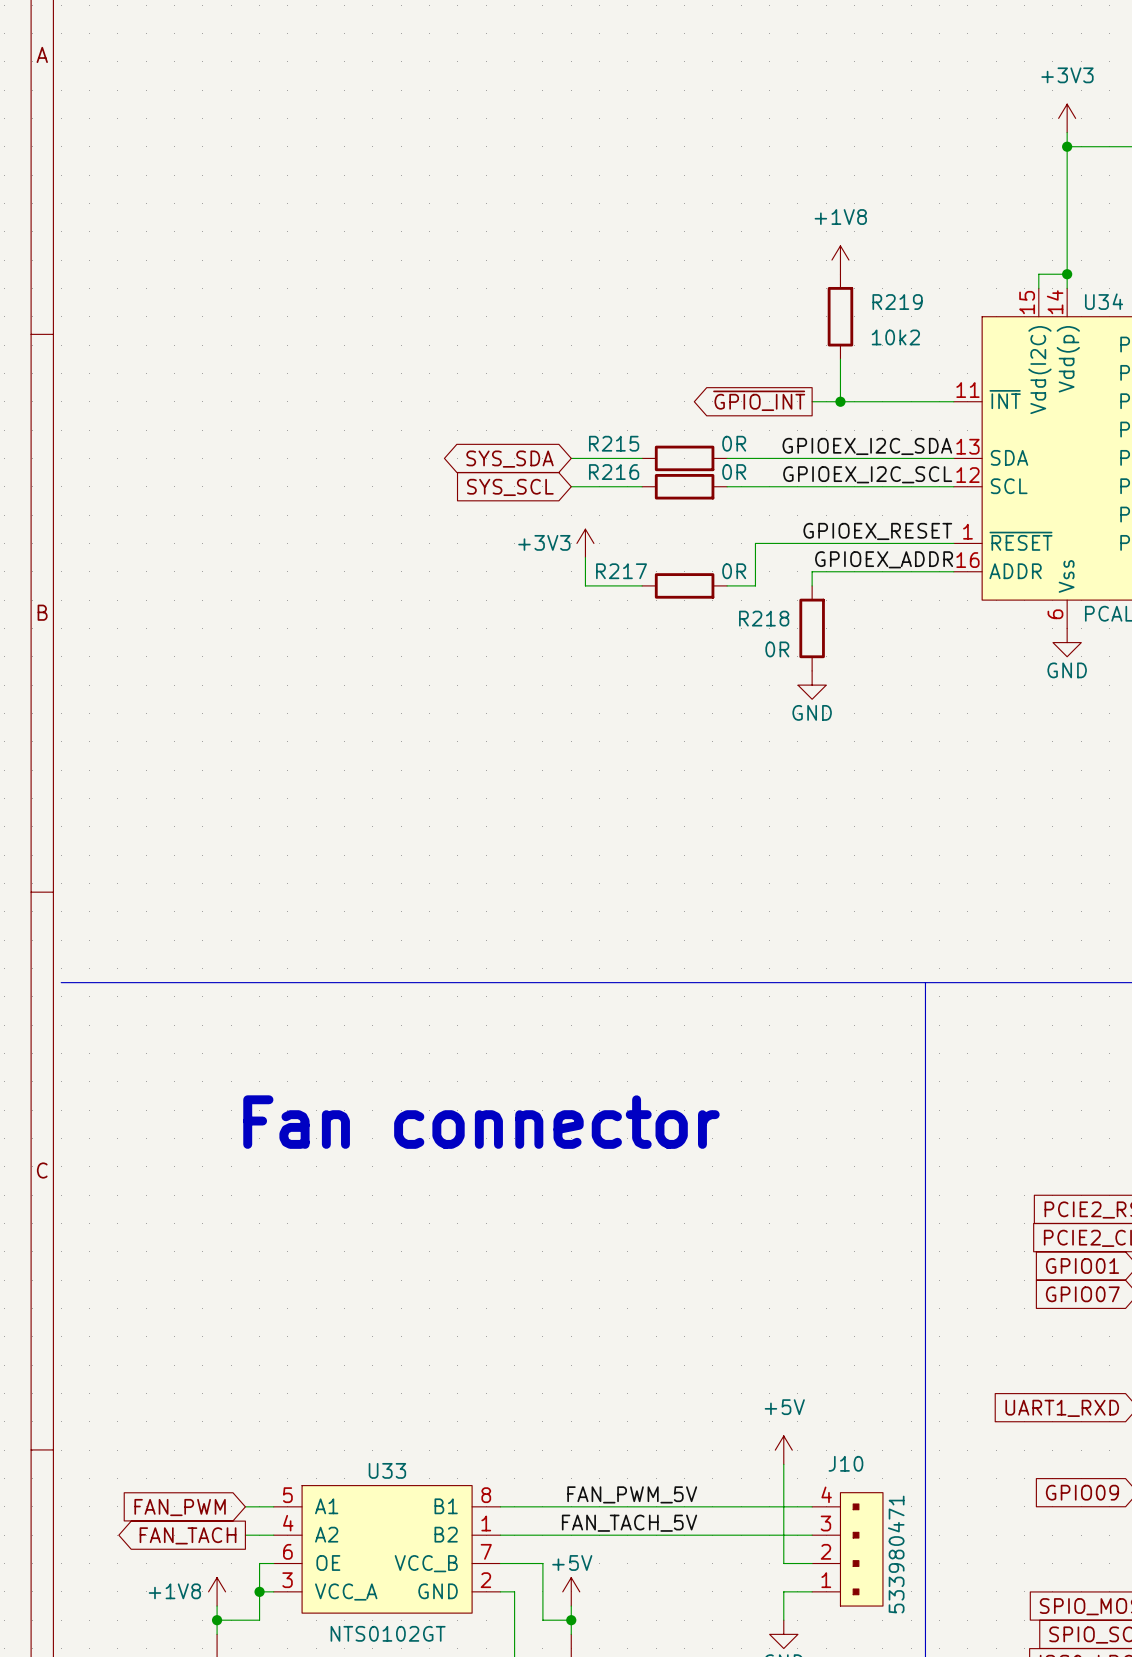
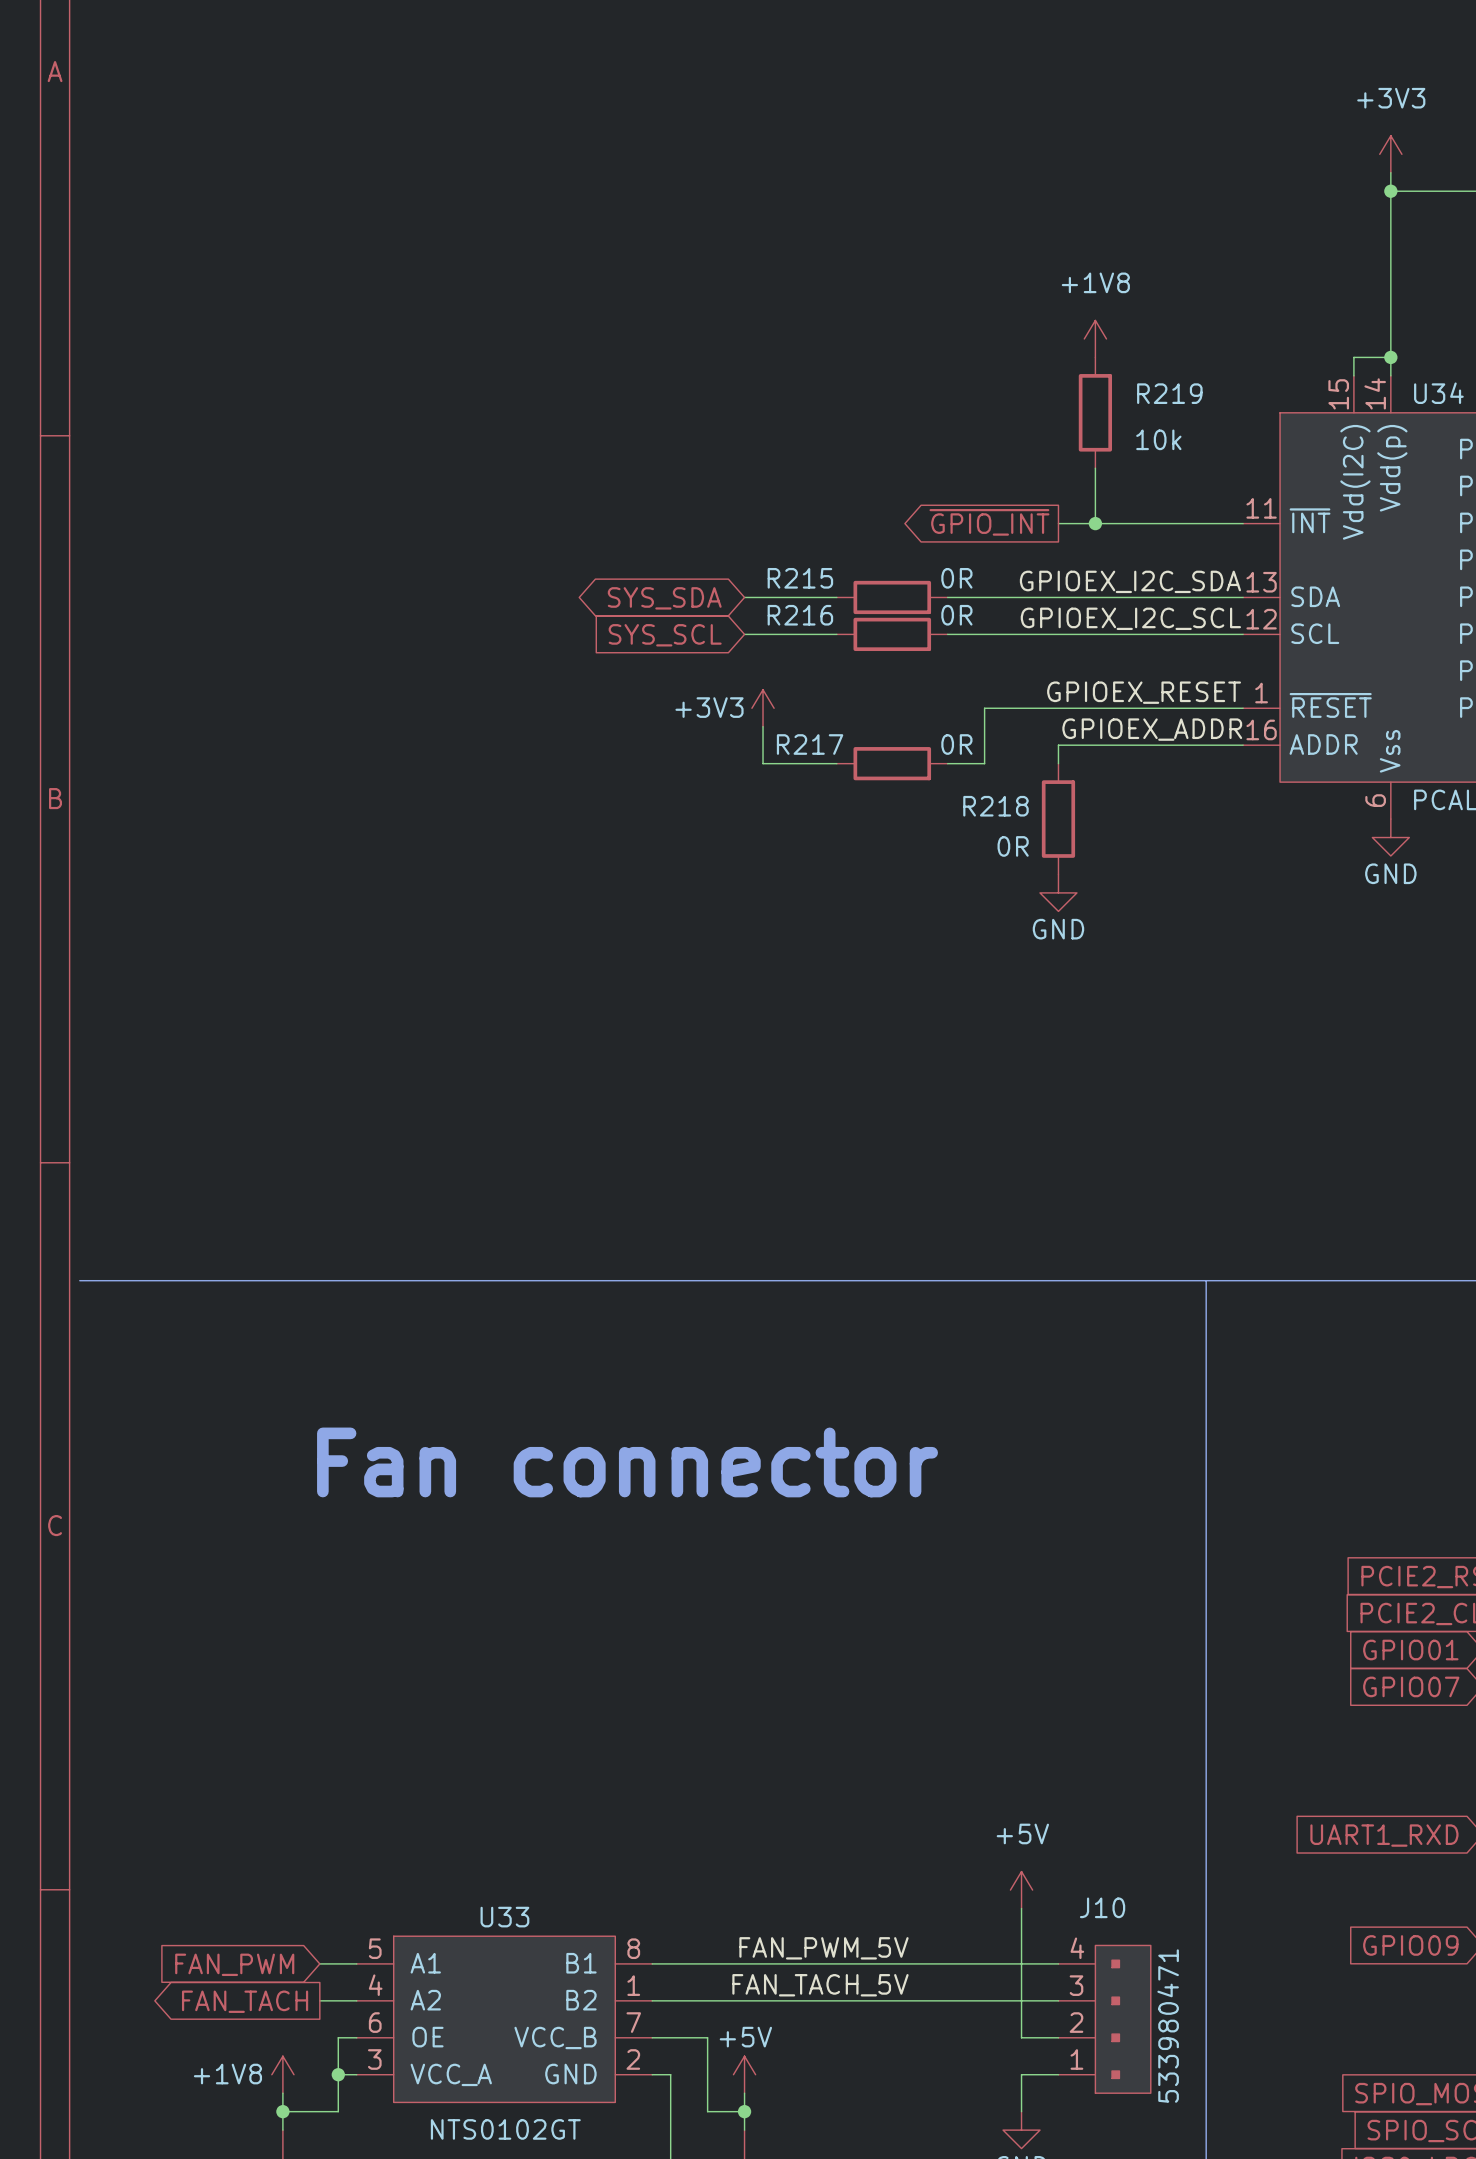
R219 text: 10k2 (895, 337) -> 10k (1158, 439)

